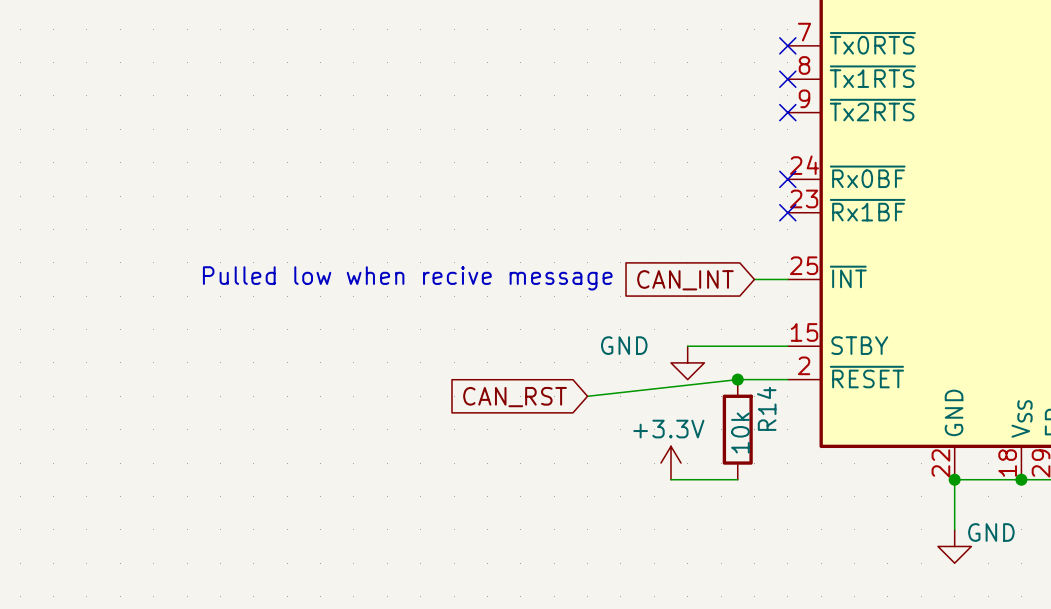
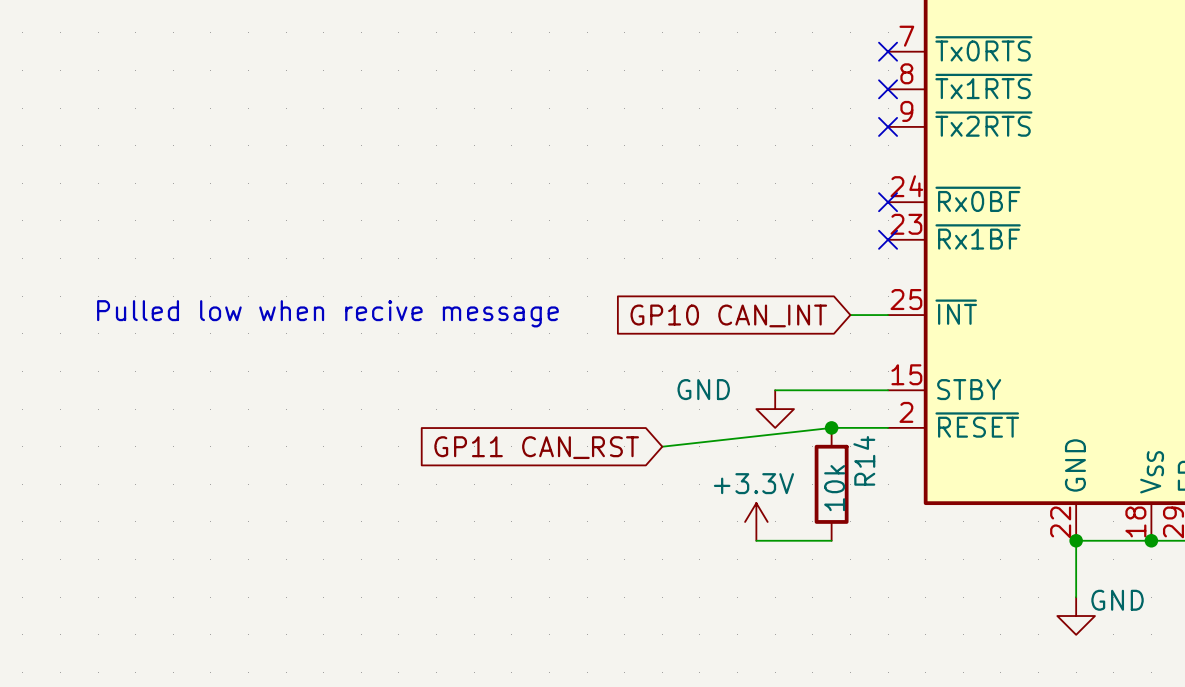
text position: Pulled low when recive message (407, 278) -> Pulled low when recive message (327, 313)
global label: CAN_INT (685, 280) -> GP10 CAN_INT (728, 315)
global label: CAN_RST (515, 397) -> GP11 CAN_RST (536, 447)

